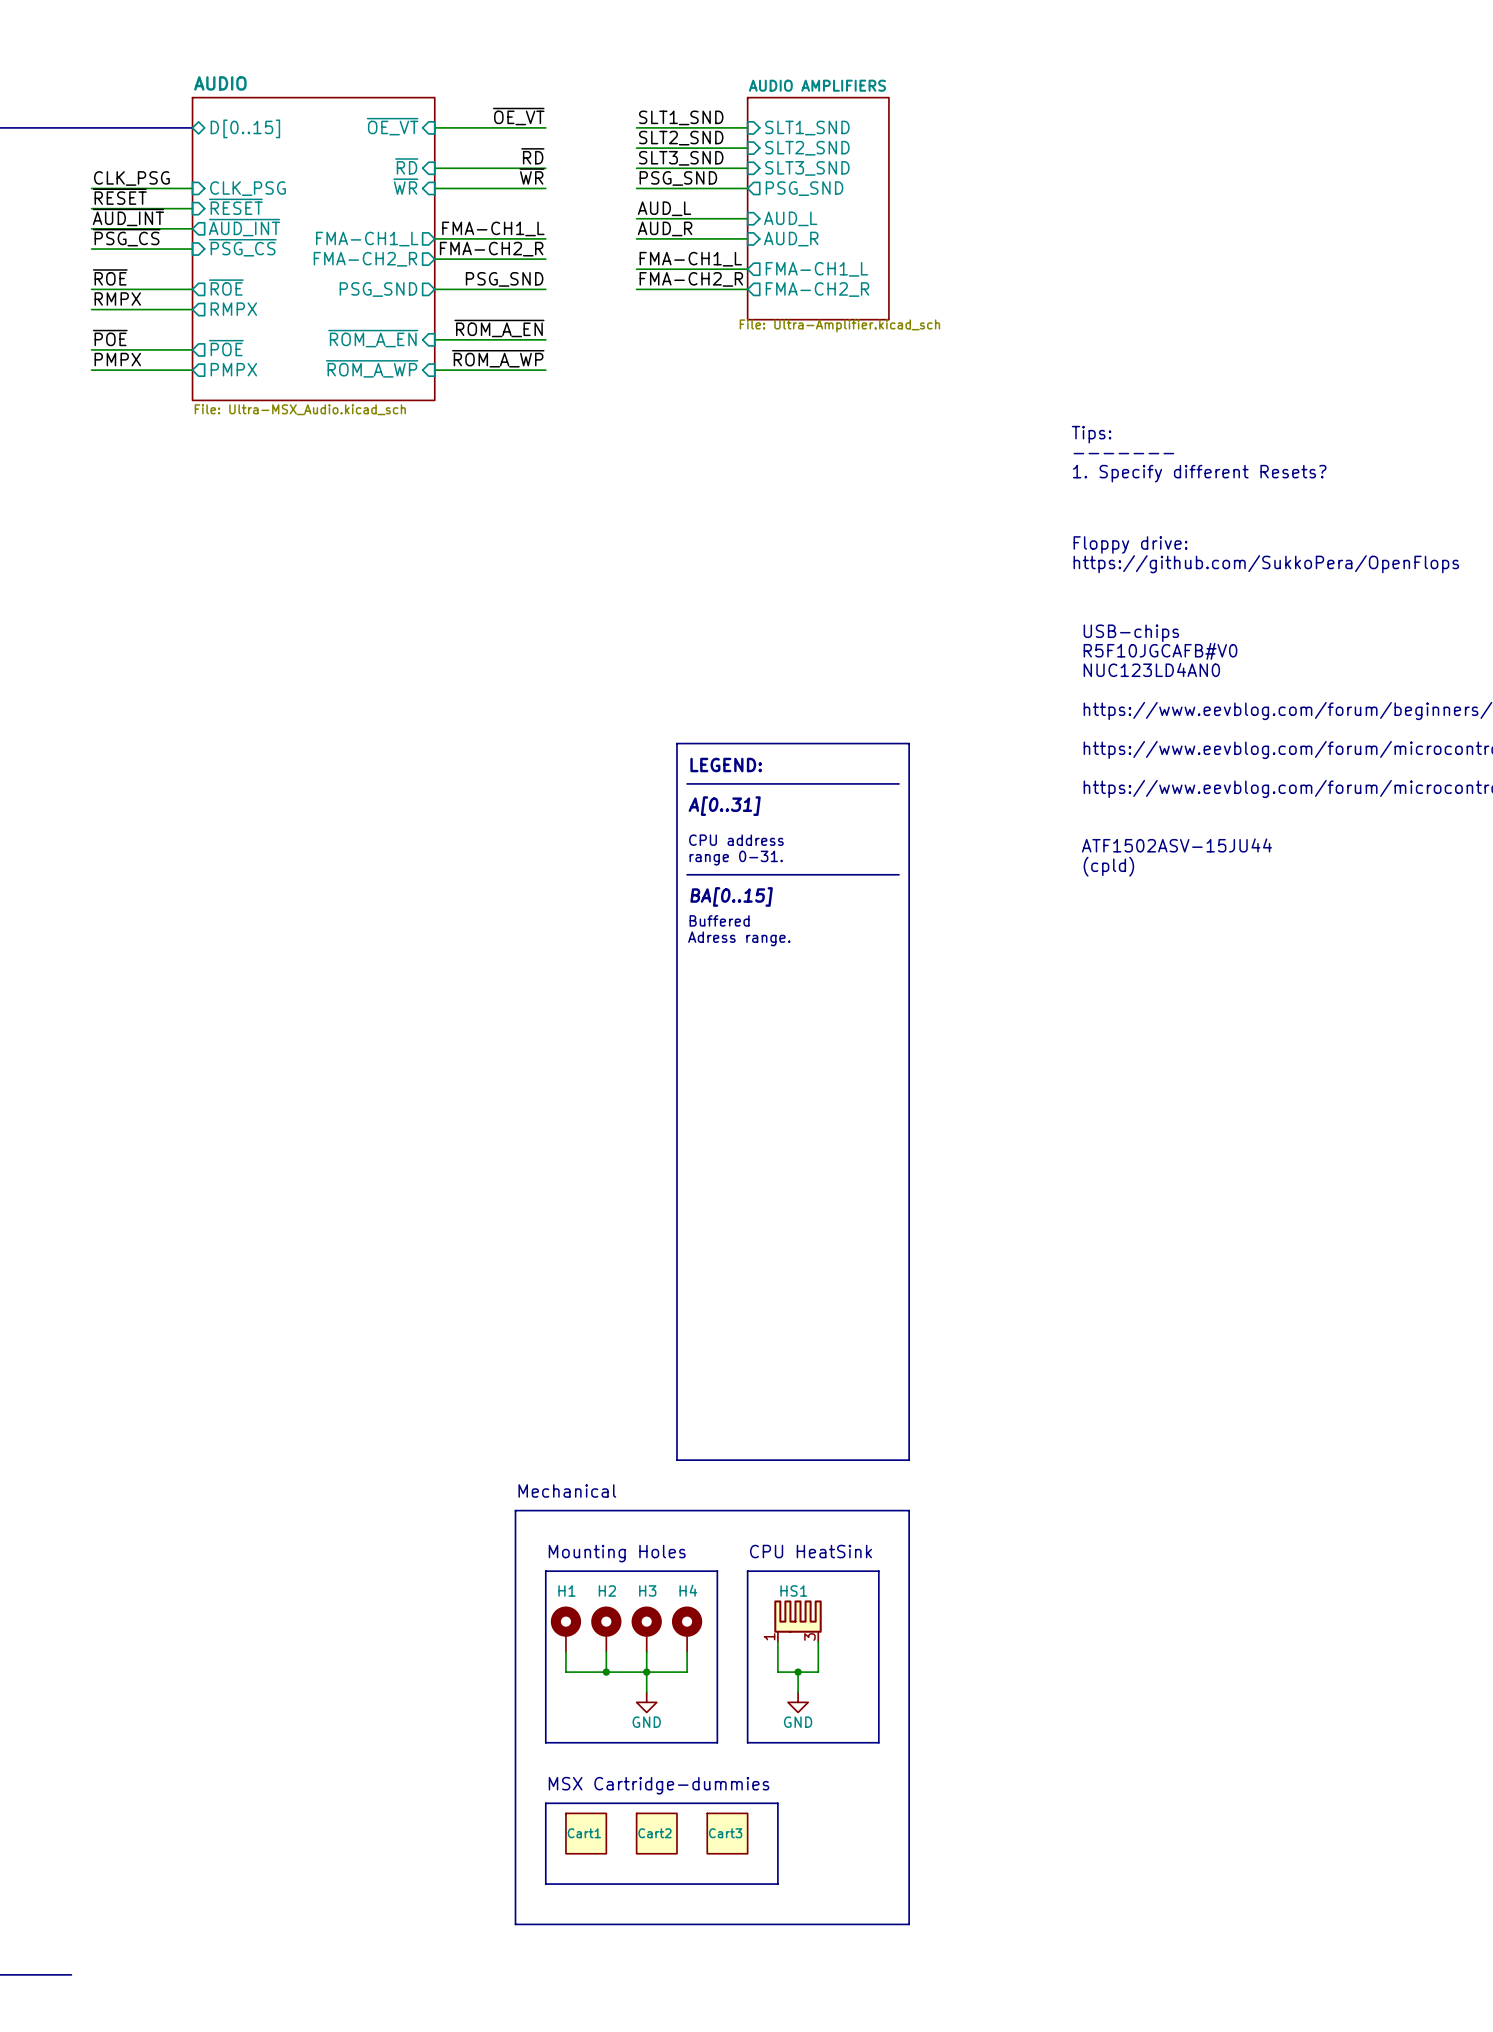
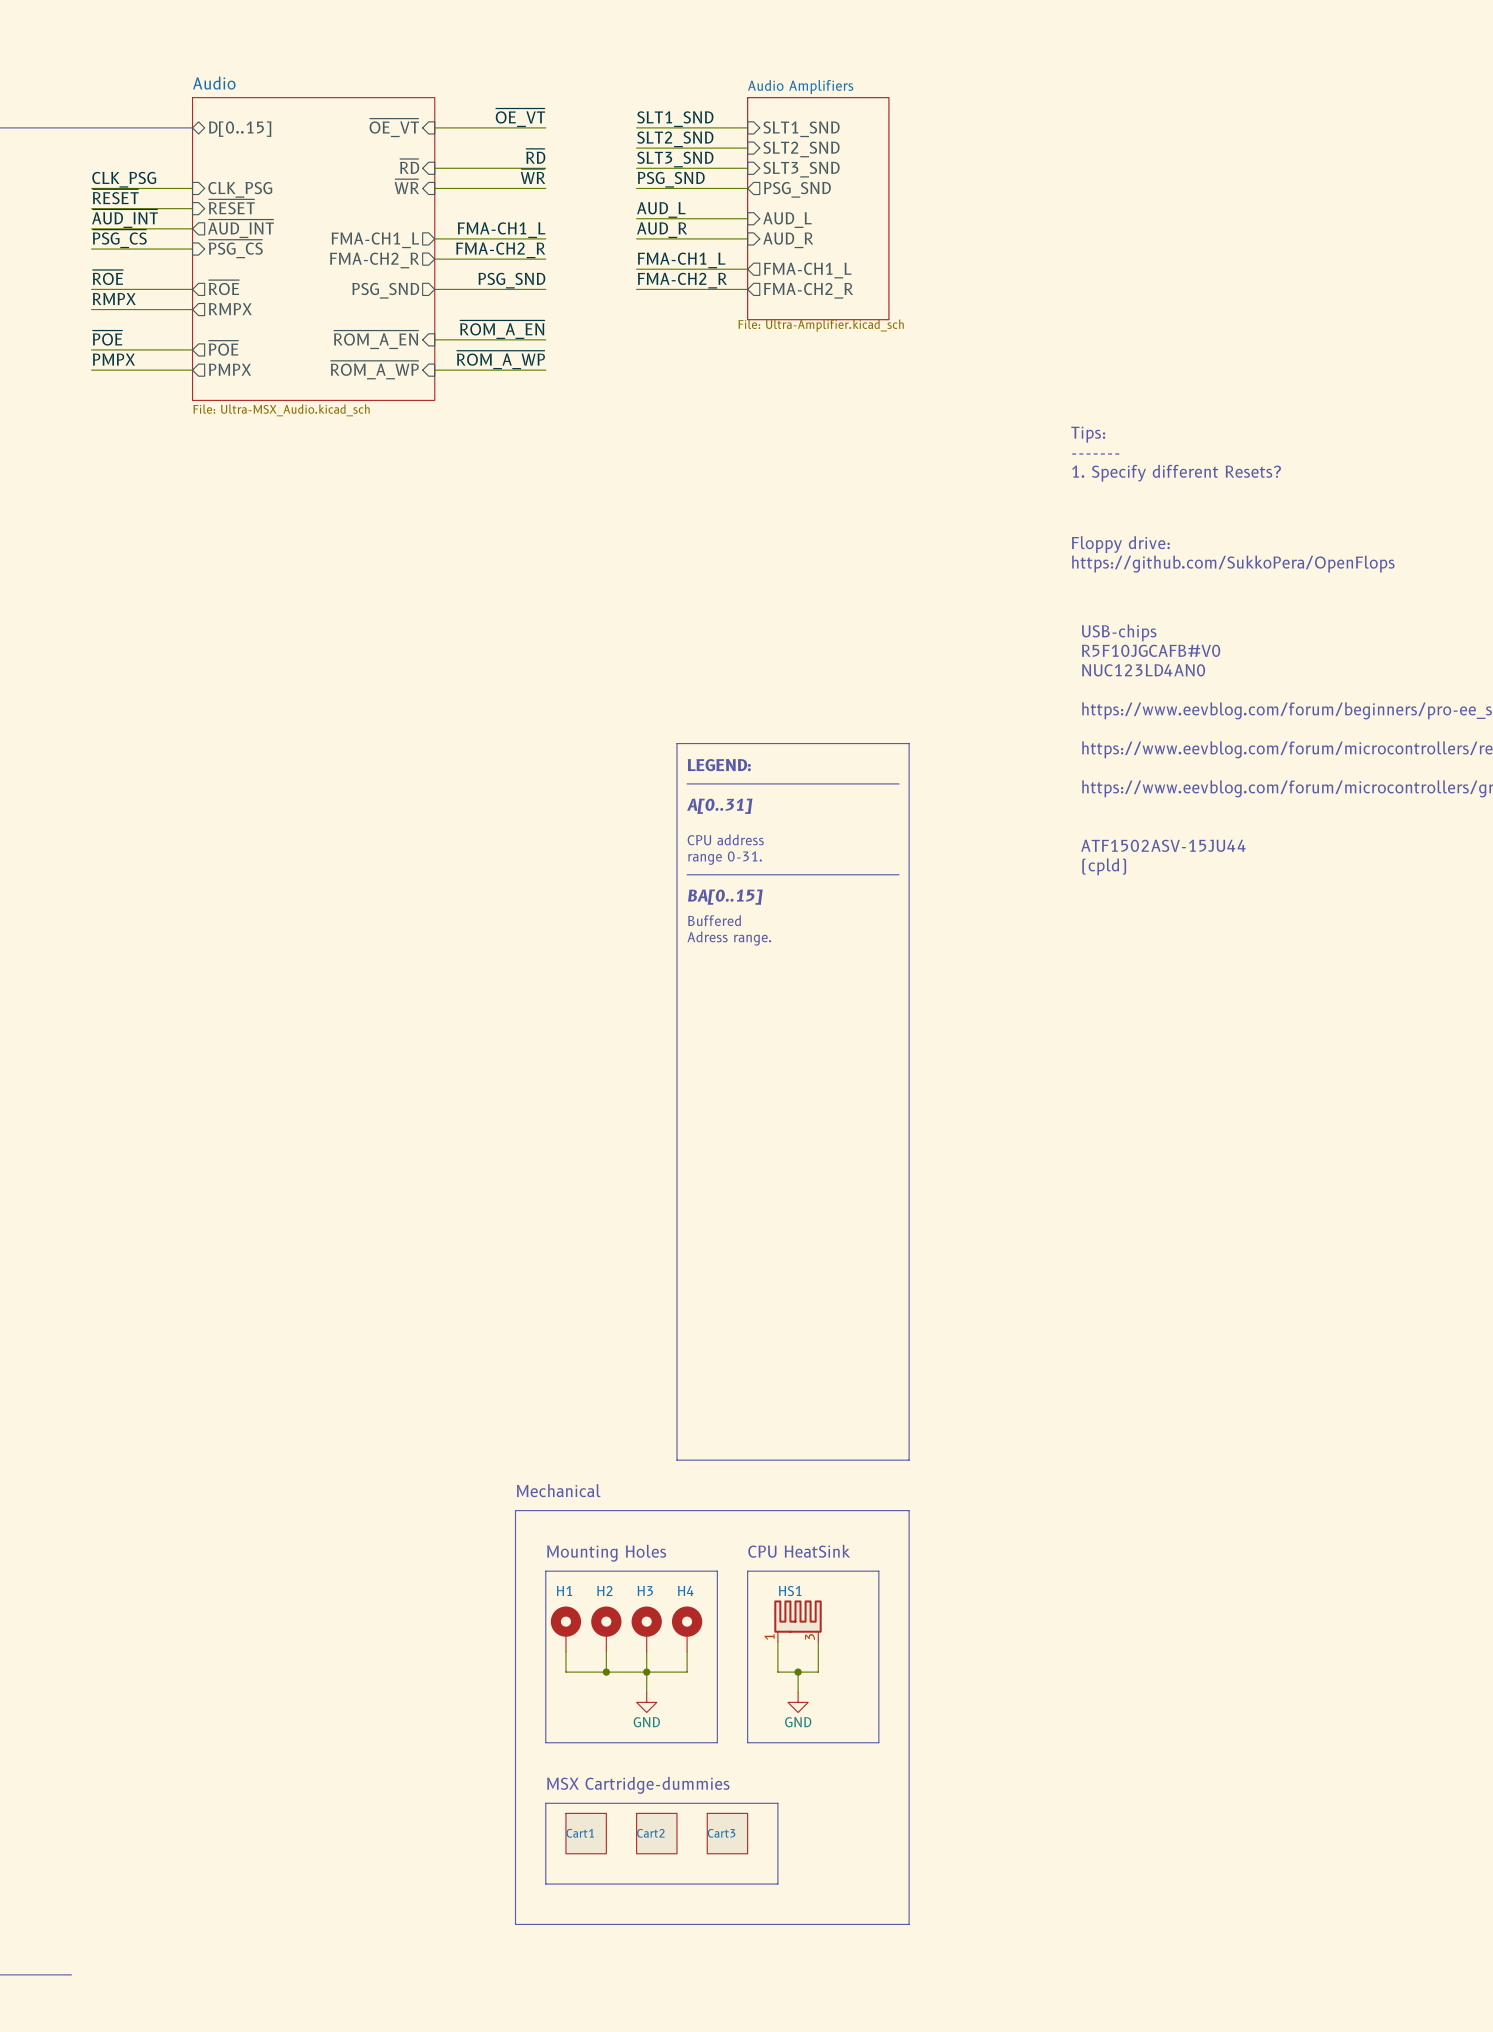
sheet AUDIO name: AUDIO (220, 83) -> Audio (214, 83)
sheet AUDIO AMPLIFIERS name: AUDIO AMPLIFIERS (817, 85) -> Audio Amplifiers (800, 87)

